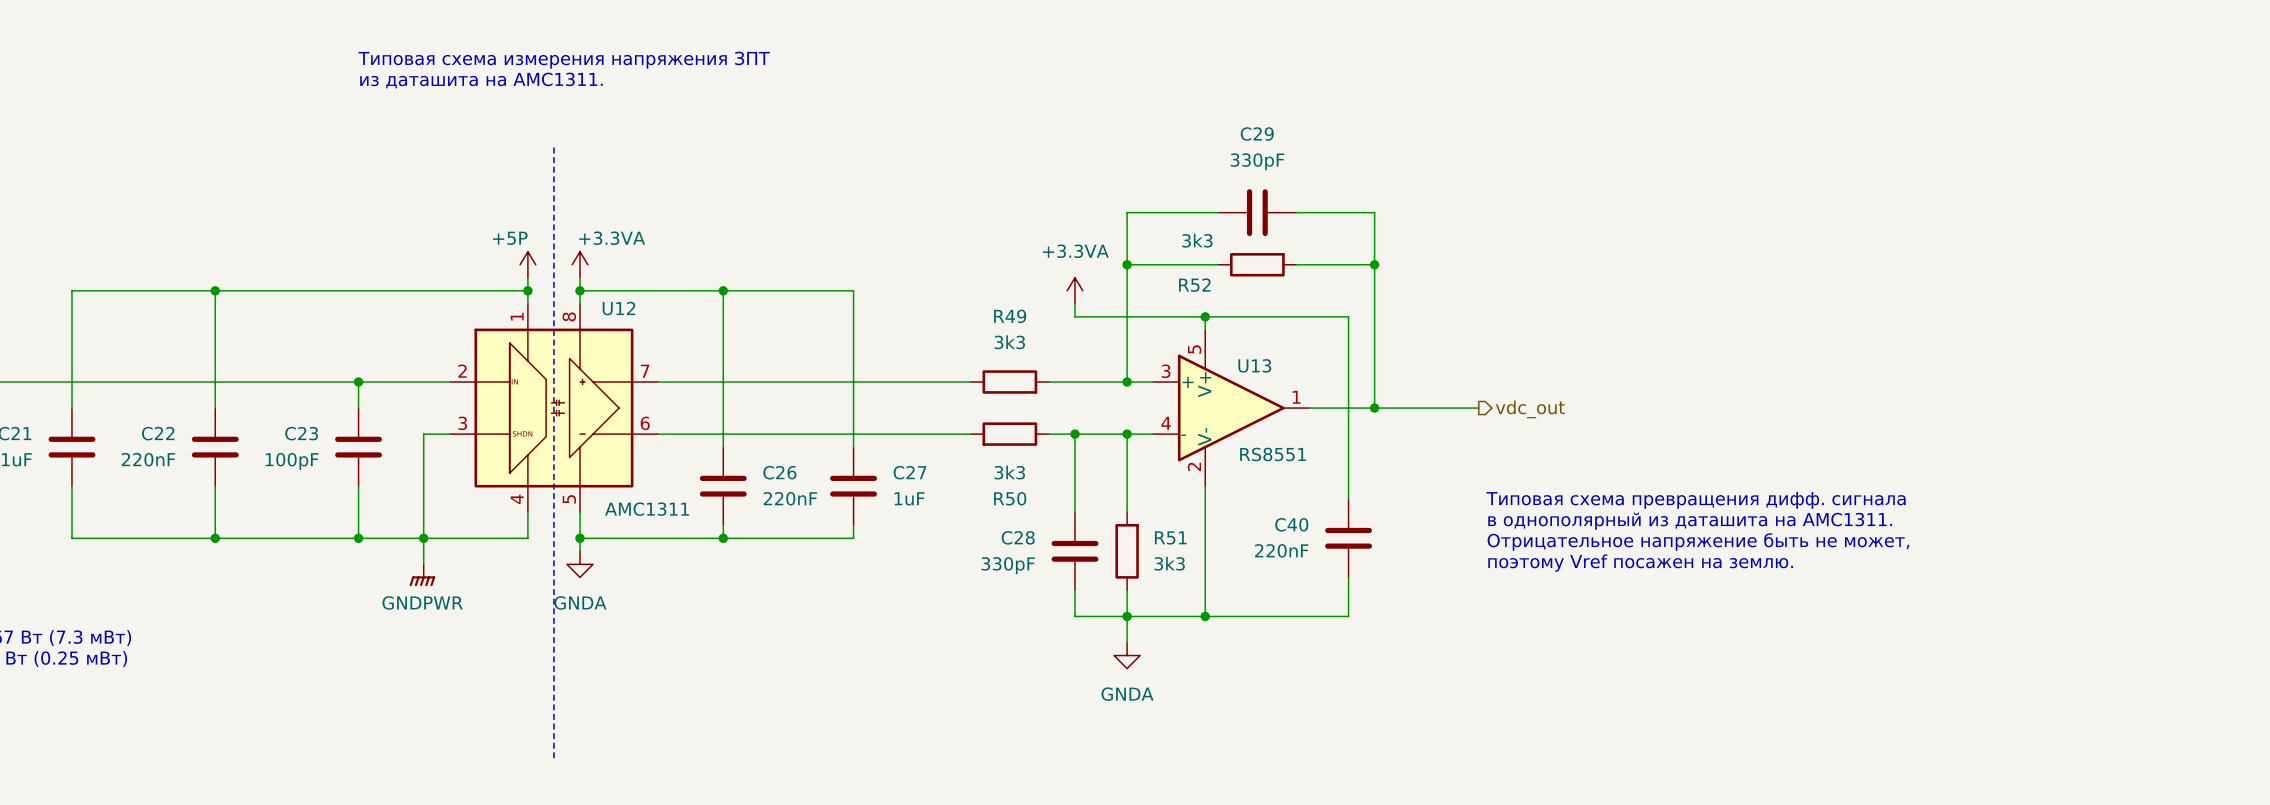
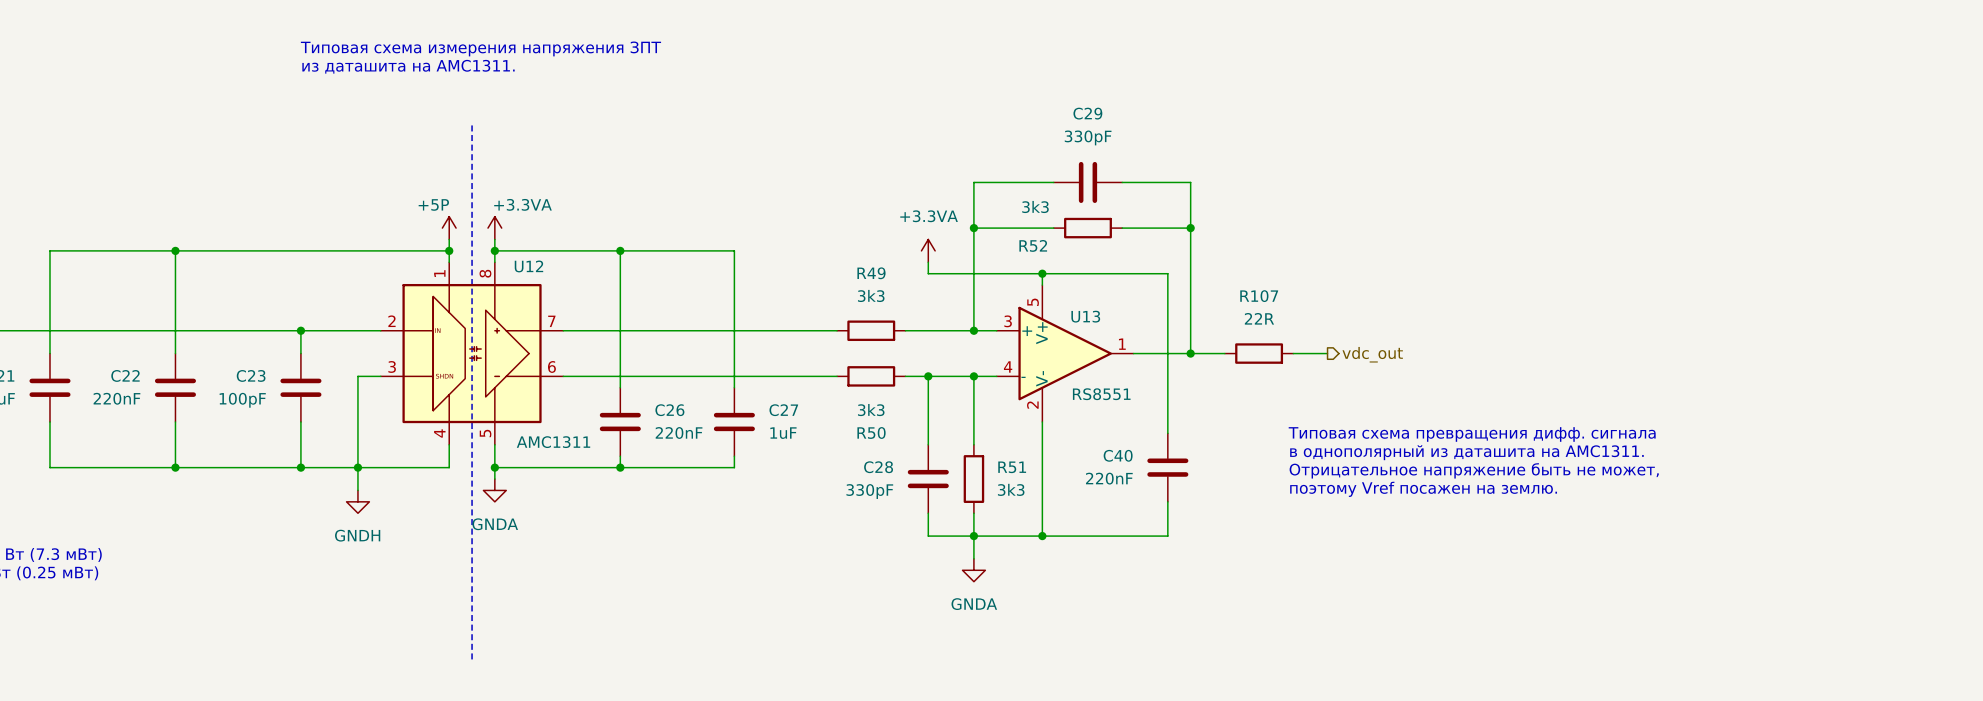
wire: (1413, 408) (1478, 408) -> none
R107: none -> 22R (1259, 353)
wire: none -> (1293, 353) (1327, 353)
hierarchical label position: vdc_out (1530, 409) -> vdc_out (1372, 354)
power symbol: GNDPWR (422, 575) -> GNDH (357, 501)

